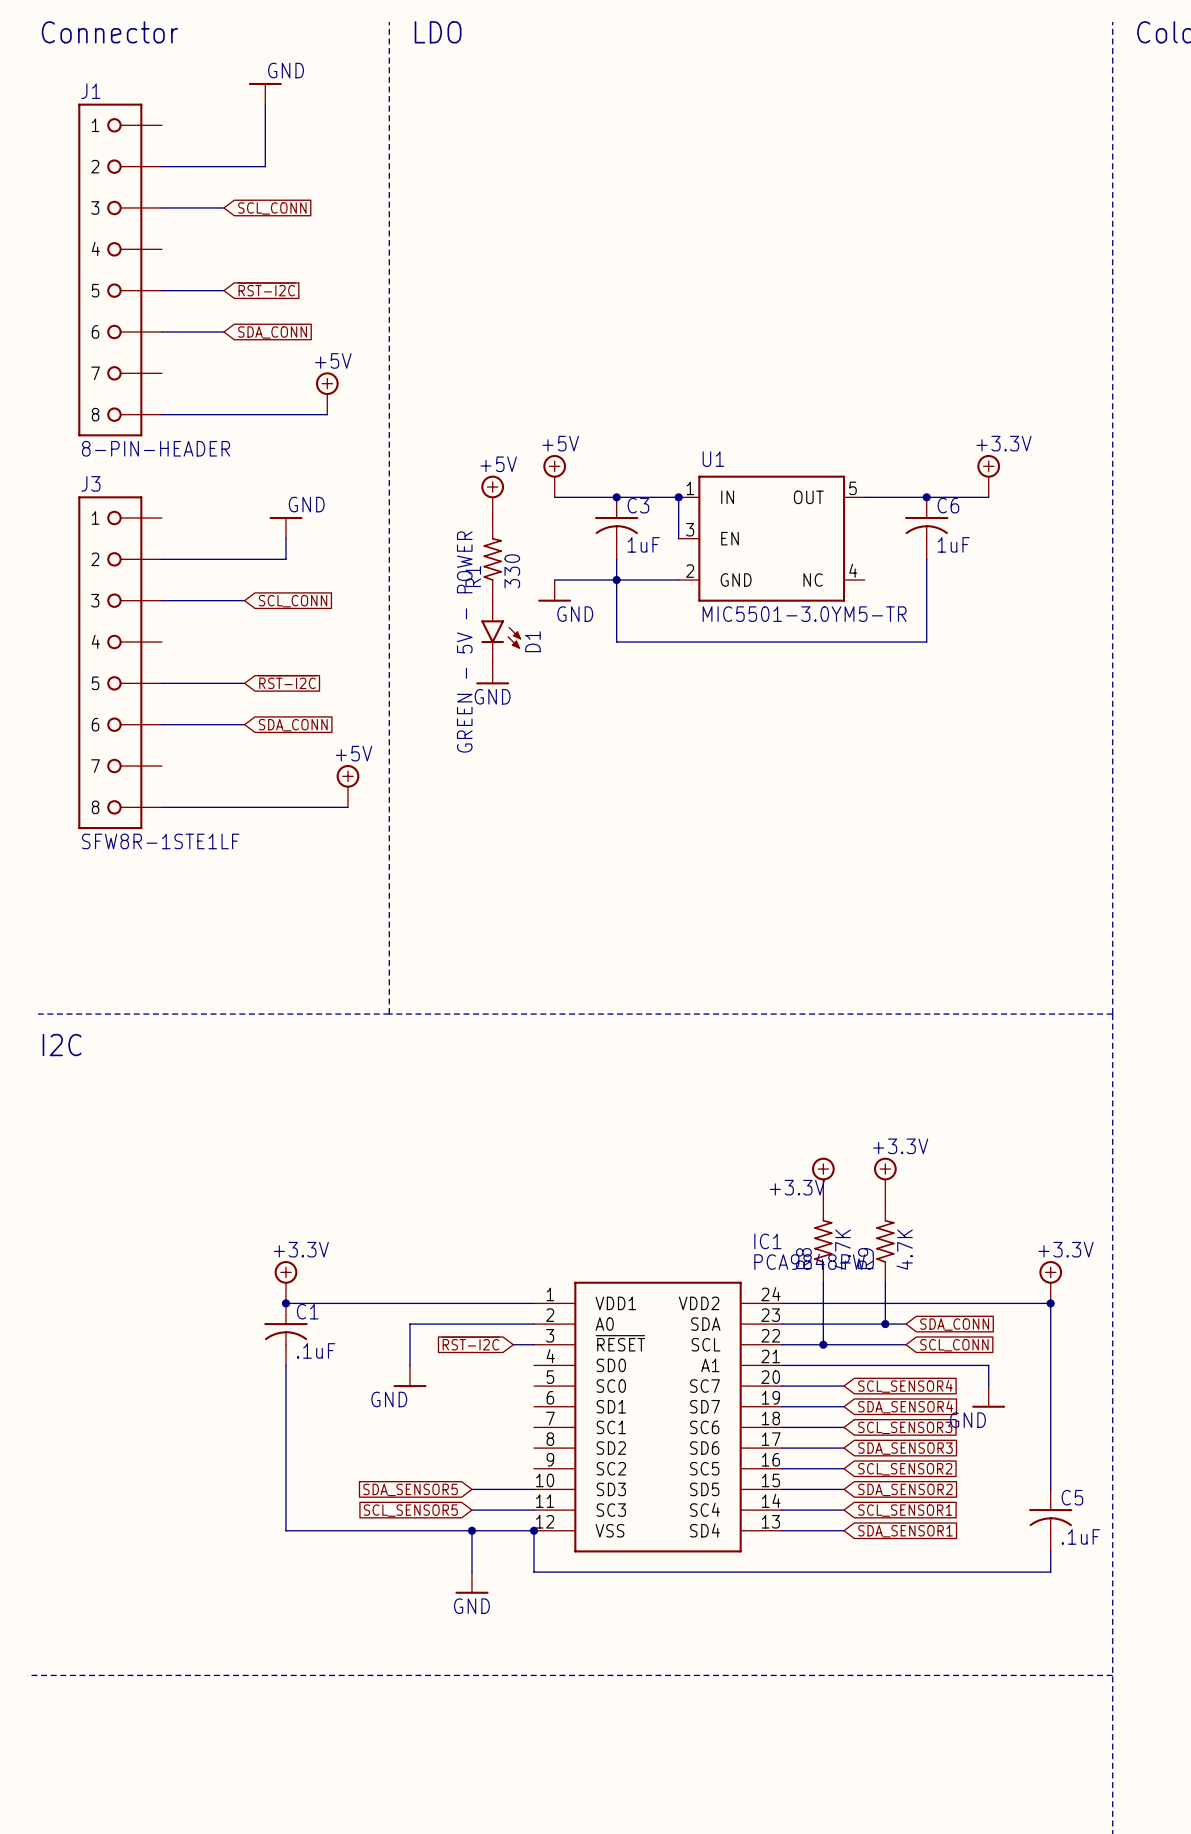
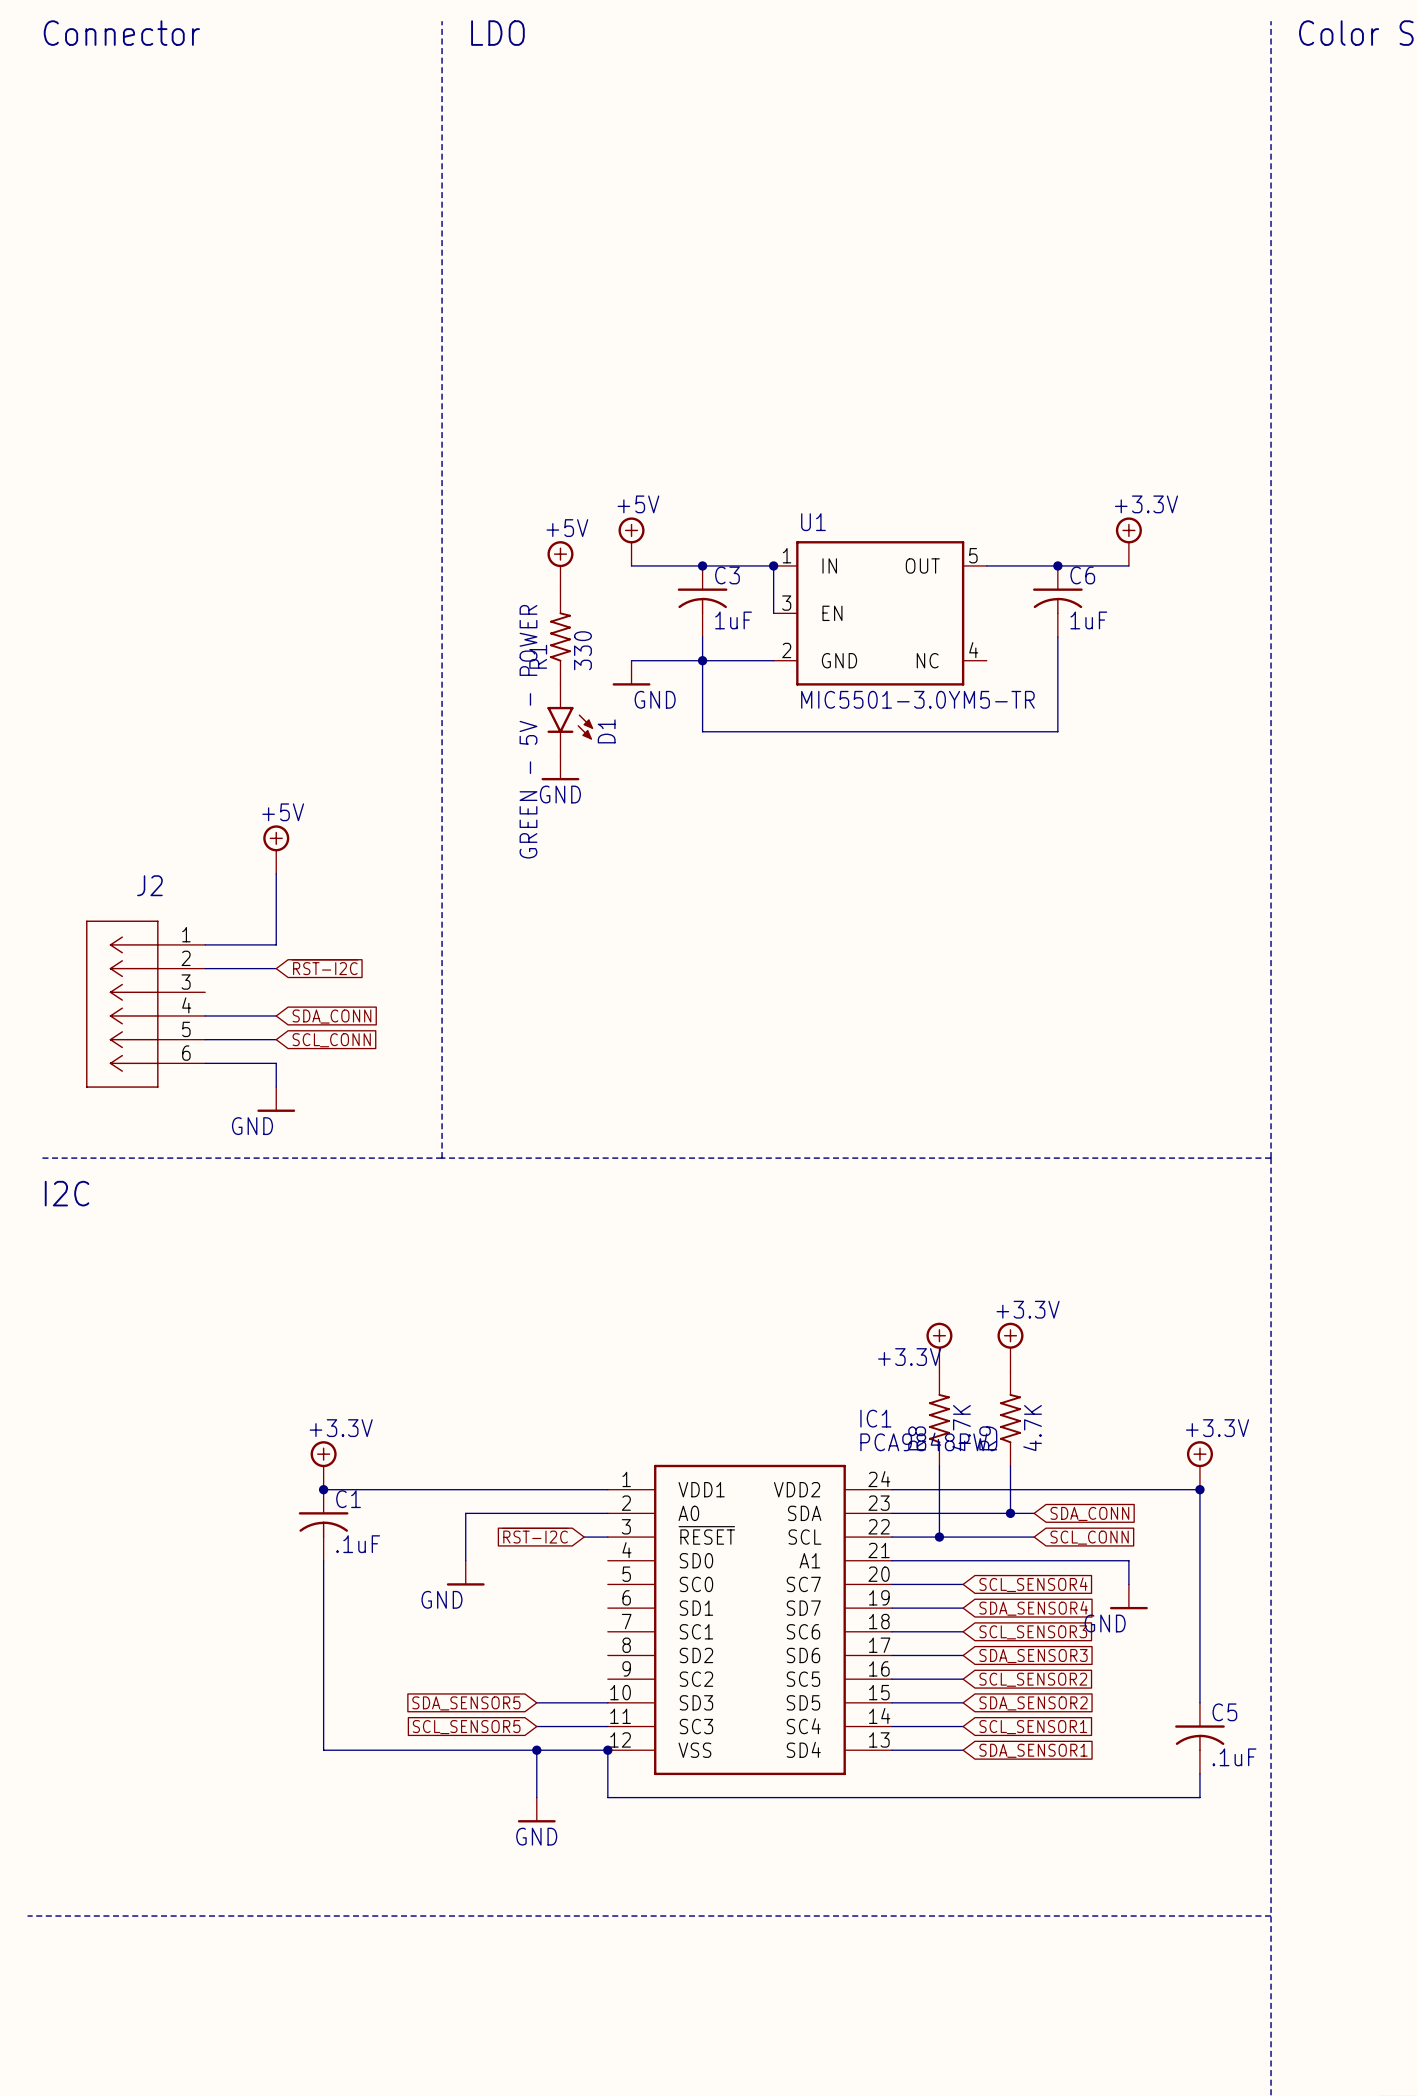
power symbol: GND (265, 93) -> none
wire: (265, 104) (265, 166) (161, 166) -> none
wire: (161, 207) (223, 207) -> none
global label: SCL_CONN (272, 208) -> none
J1: 8-PIN-HEADER (120, 269) -> none
global label: ~{RST-I2C} (266, 289) -> none
wire: (161, 290) (223, 290) -> none
wire: (161, 331) (223, 331) -> none
global label: SDA_CONN (272, 332) -> none
power symbol: +5V (327, 393) -> none
wire: (161, 414) (327, 414) -> none
power symbol: GND (285, 527) -> none
wire: (285, 538) (285, 559) (161, 559) -> none
wire: (161, 600) (244, 600) -> none
global label: SCL_CONN (293, 601) -> none
J3: SFW8R-1STE1LF (120, 662) -> none
global label position: ~{RST-I2C} (287, 682) -> ~{RST-I2C} (325, 967)
wire: (161, 683) (244, 683) -> none
wire: (161, 724) (244, 724) -> none
global label position: SDA_CONN (293, 725) -> SDA_CONN (331, 1016)
wire: none -> (276, 873) (276, 944) (205, 944)
power symbol position: +5V (347, 786) -> +5V (276, 849)
wire: (161, 807) (347, 807) -> none
wire: none -> (205, 968) (276, 968)
J2: none -> (145, 1004)
wire: none -> (205, 1015) (276, 1015)
wire: none -> (205, 1039) (276, 1039)
global label: none -> SCL_CONN (331, 1040)
wire: none -> (205, 1063) (276, 1063) (276, 1087)
power symbol: none -> GND (276, 1099)

